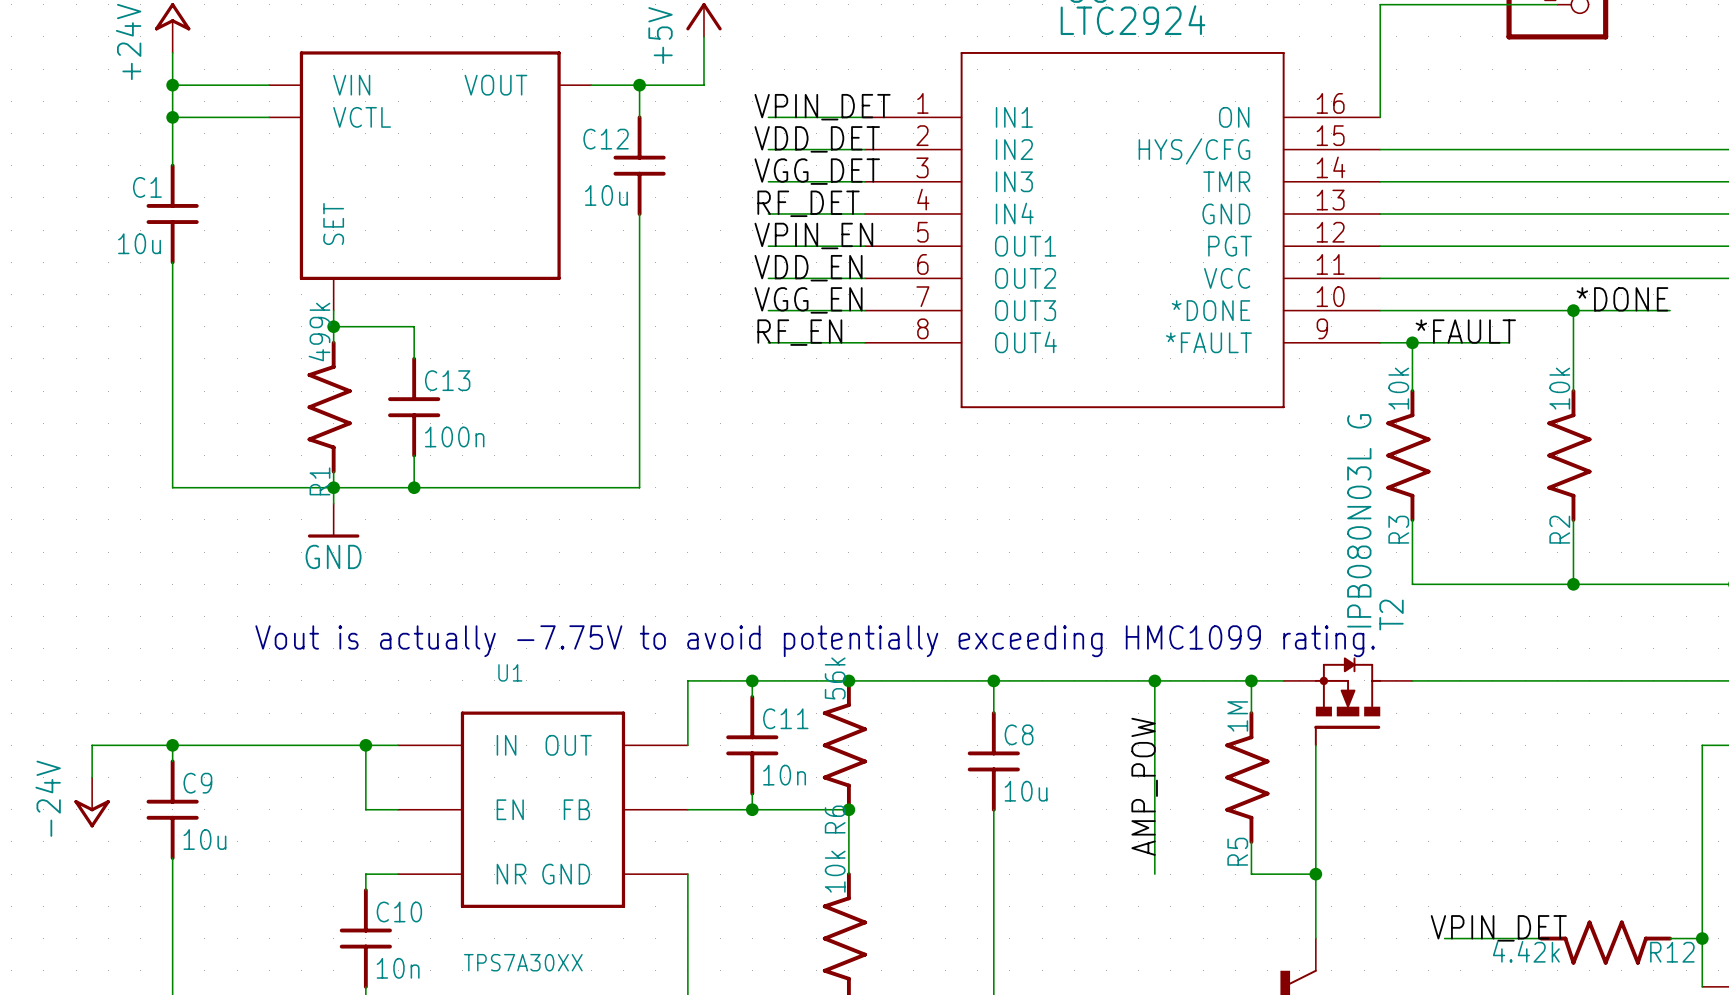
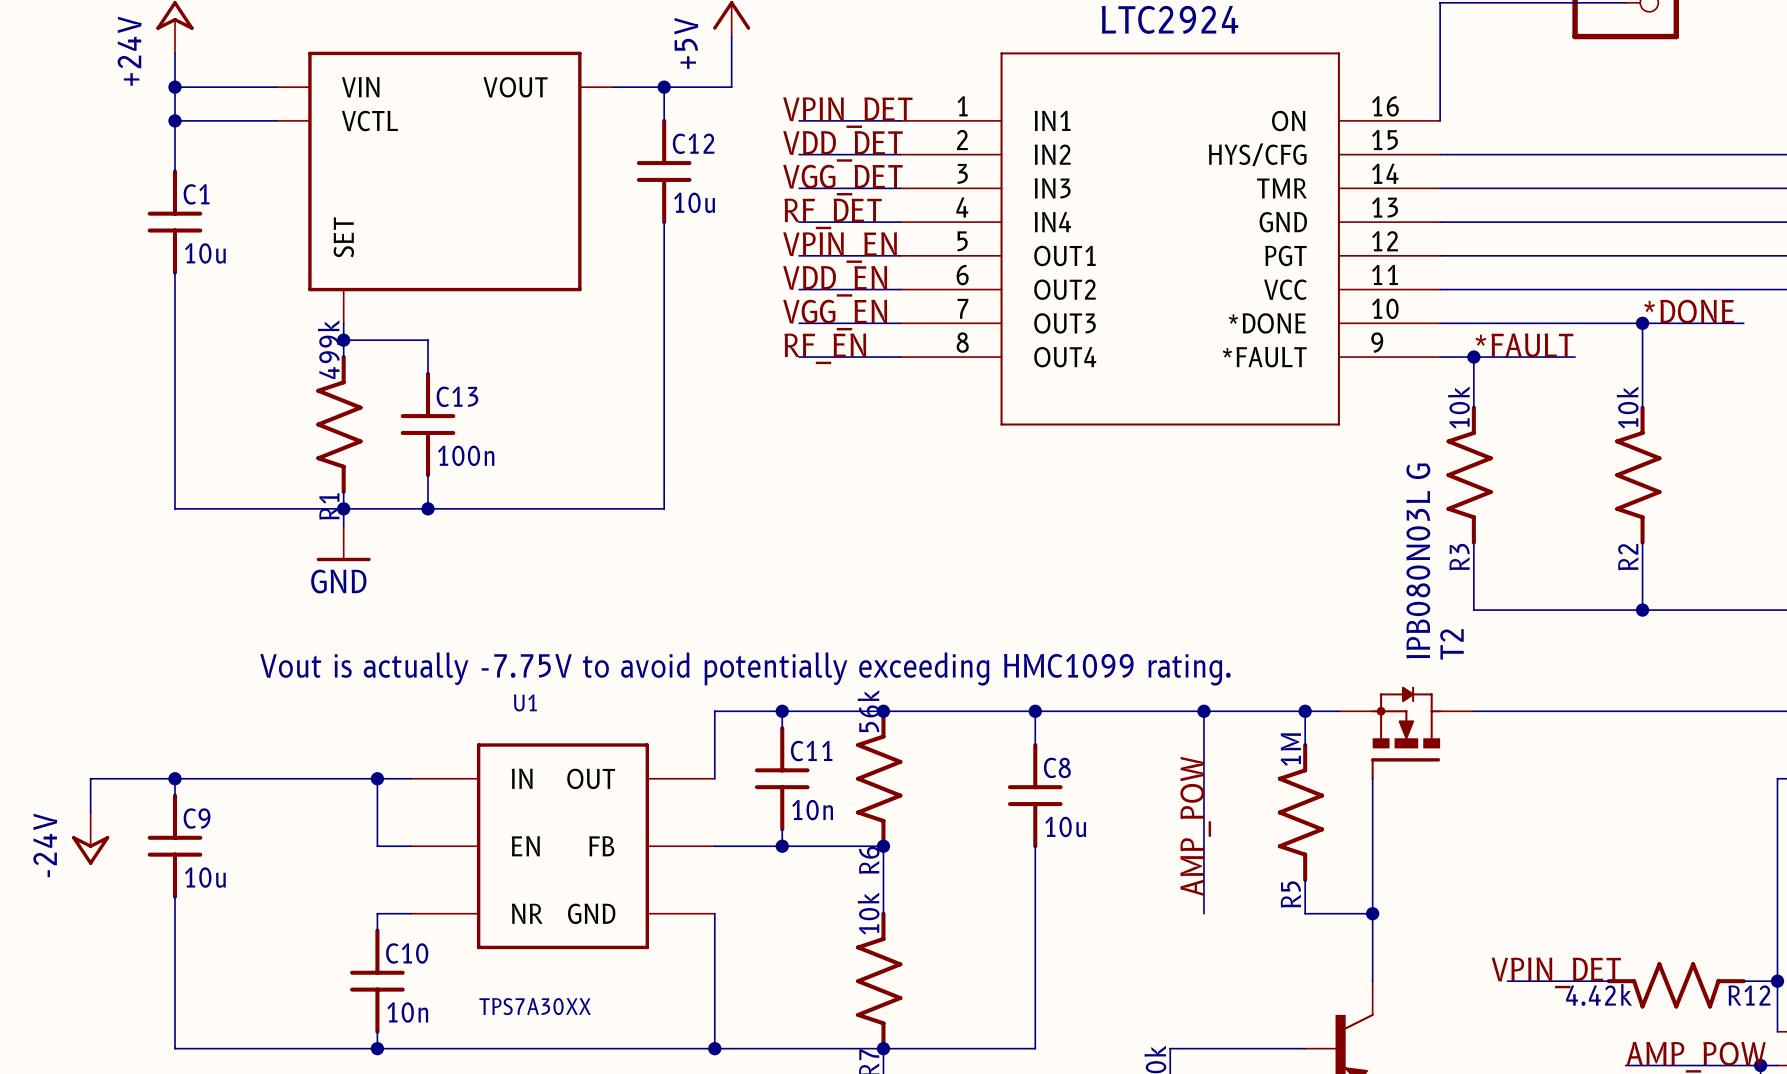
C12 name position: C12 (606, 139) -> C12 (693, 143)
C1 name position: C1 (147, 187) -> C1 (196, 194)
C12 value position: 10u (606, 195) -> 10u (694, 202)
C1 value position: 10u (139, 243) -> 10u (205, 253)

